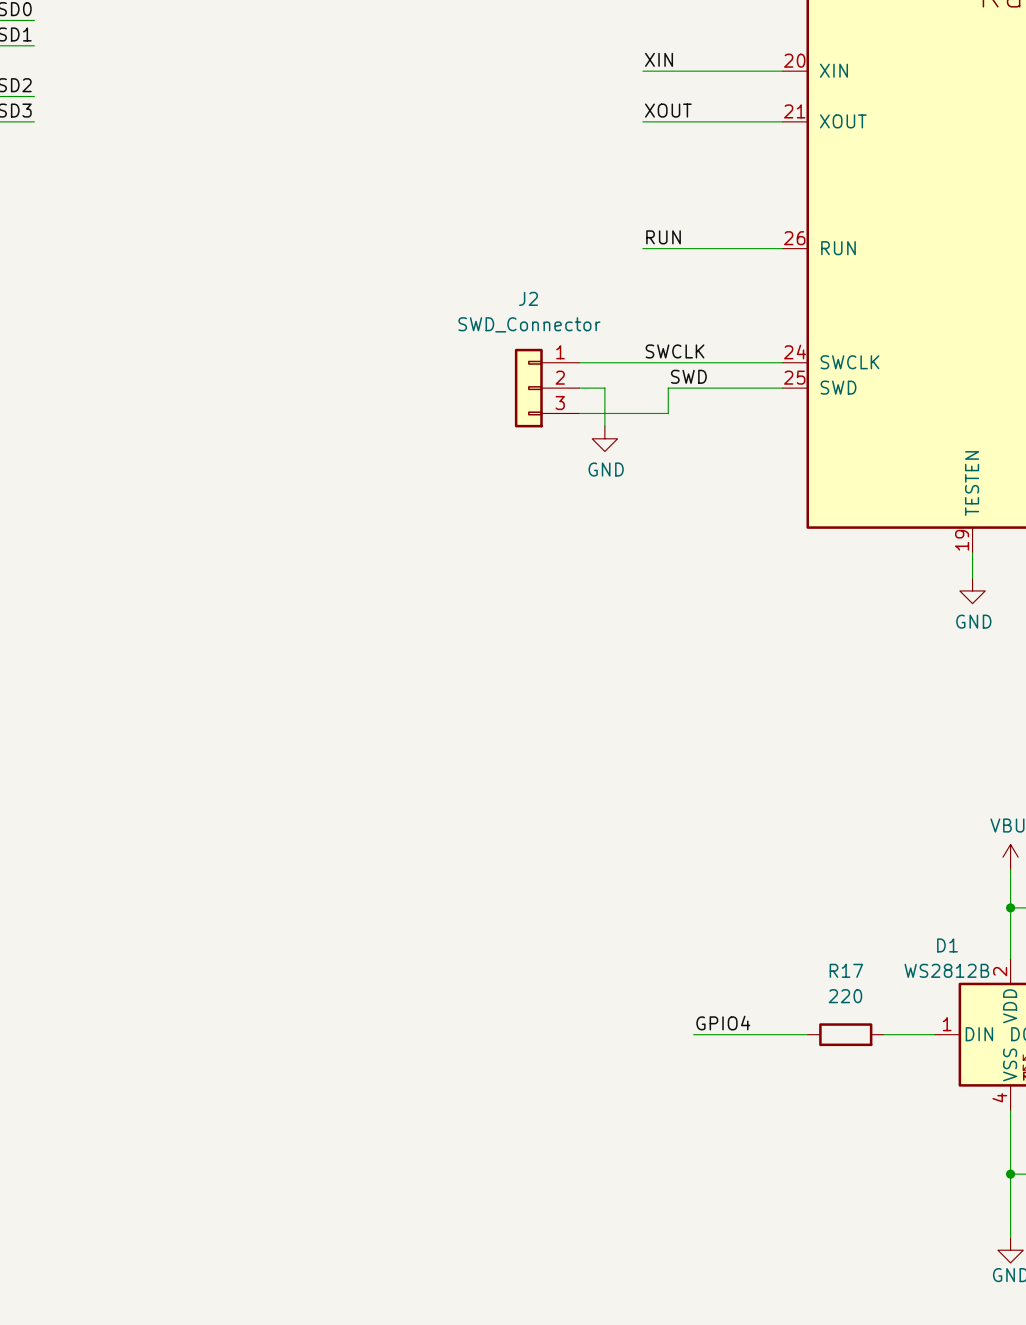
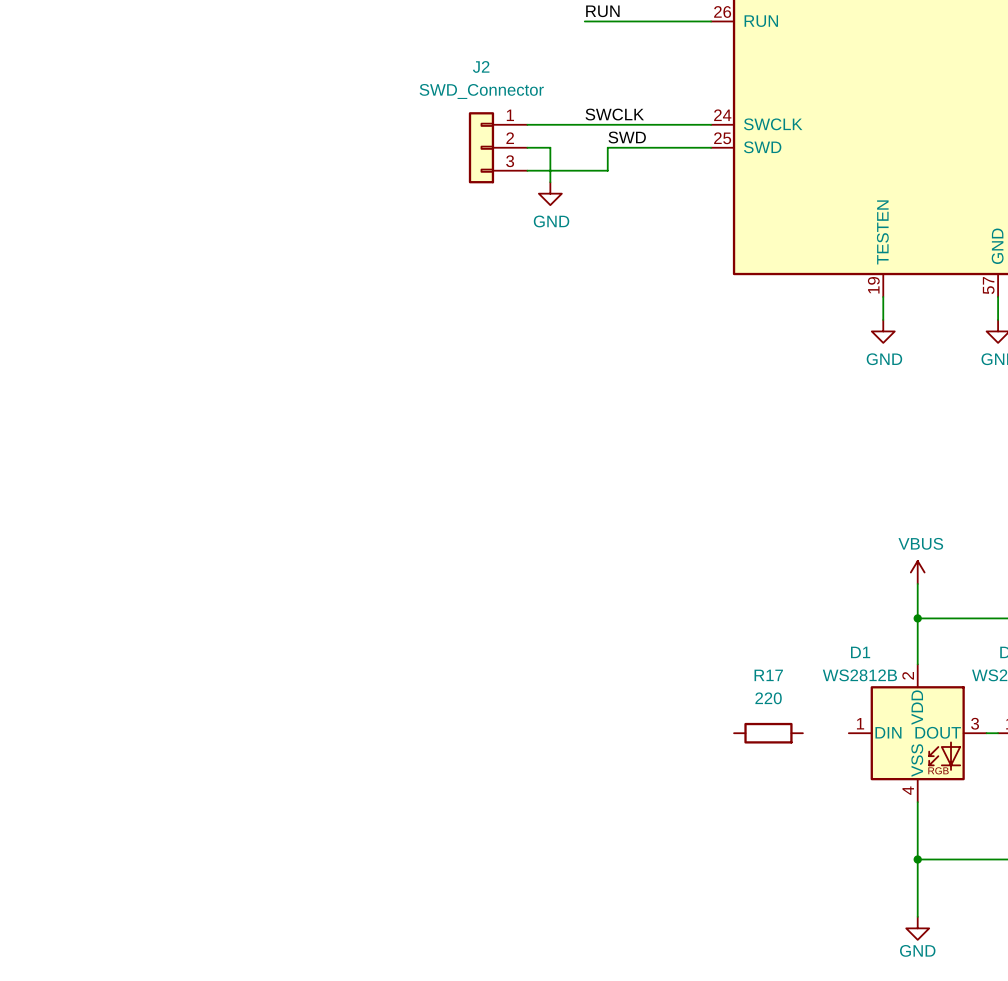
label: GPIO4 (723, 1023) -> none
wire: (693, 1034) (807, 1034) -> none
wire: (883, 1034) (934, 1034) -> none

